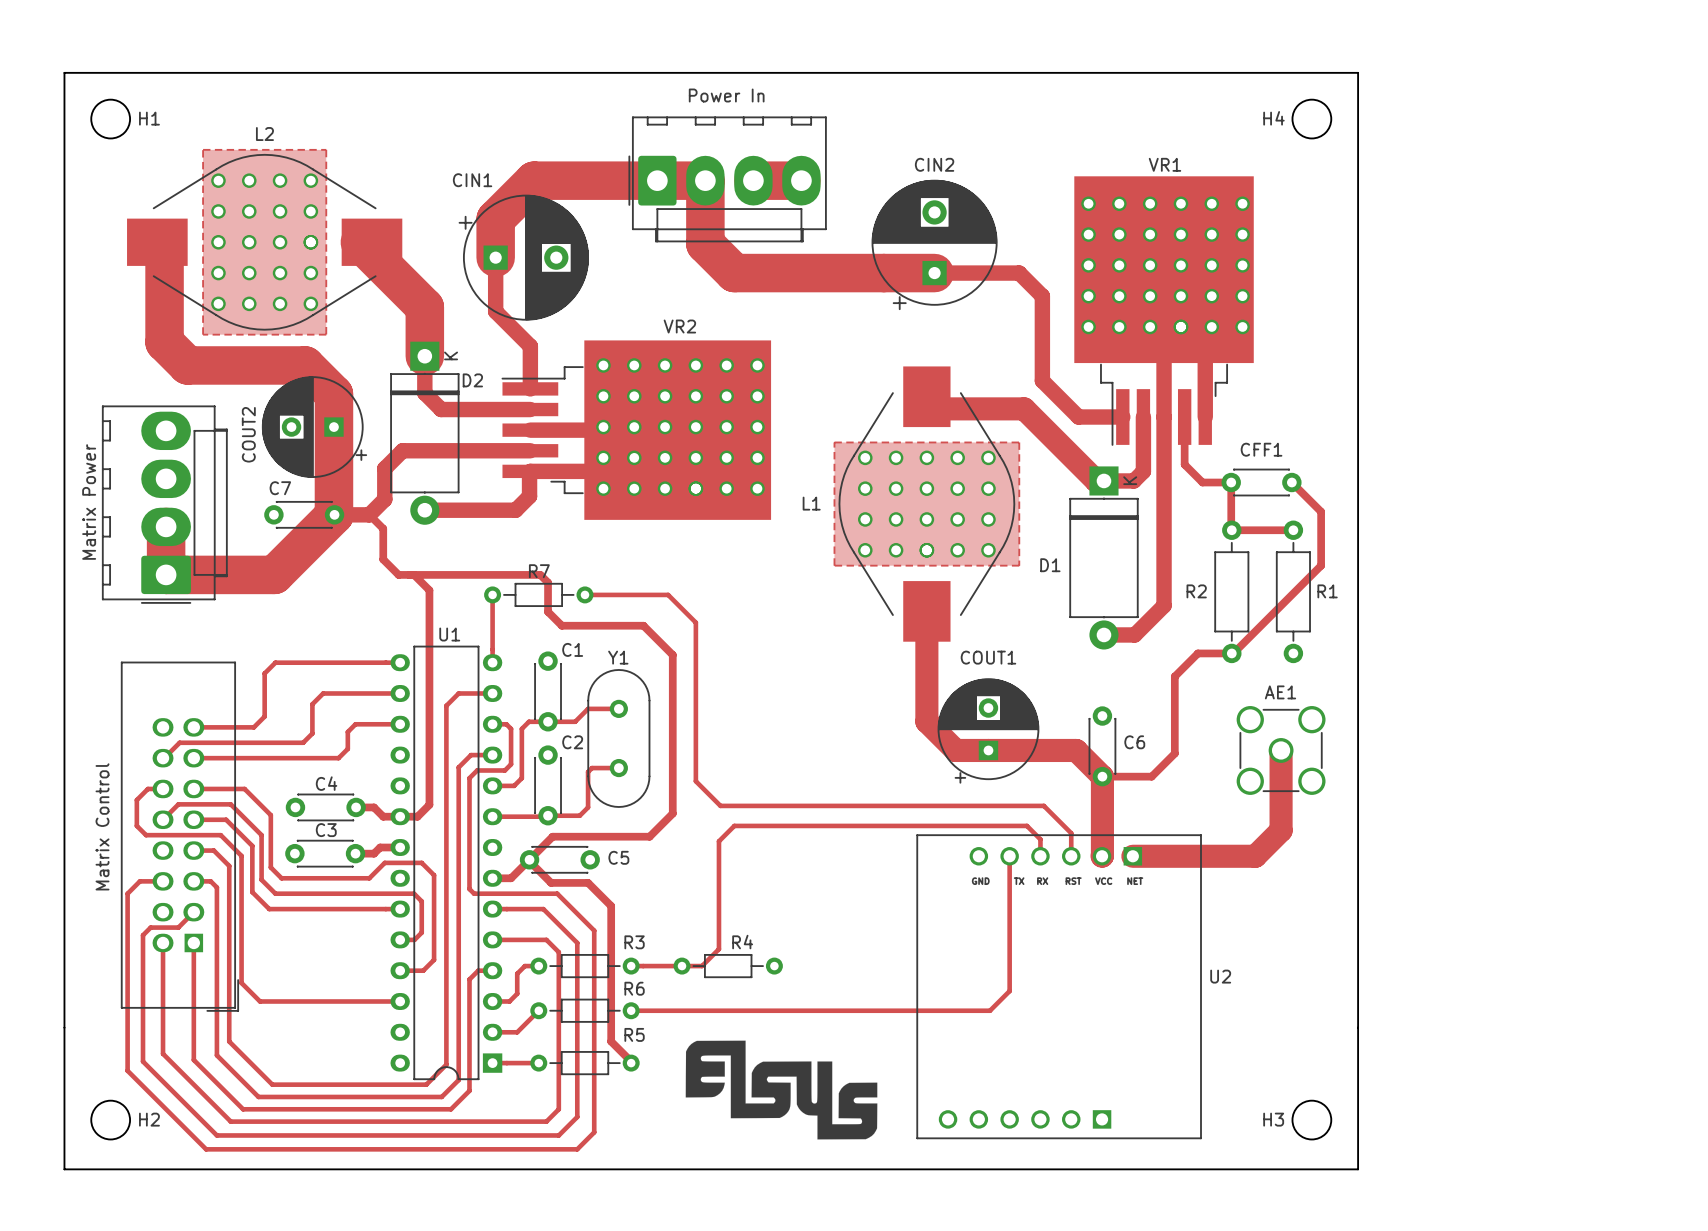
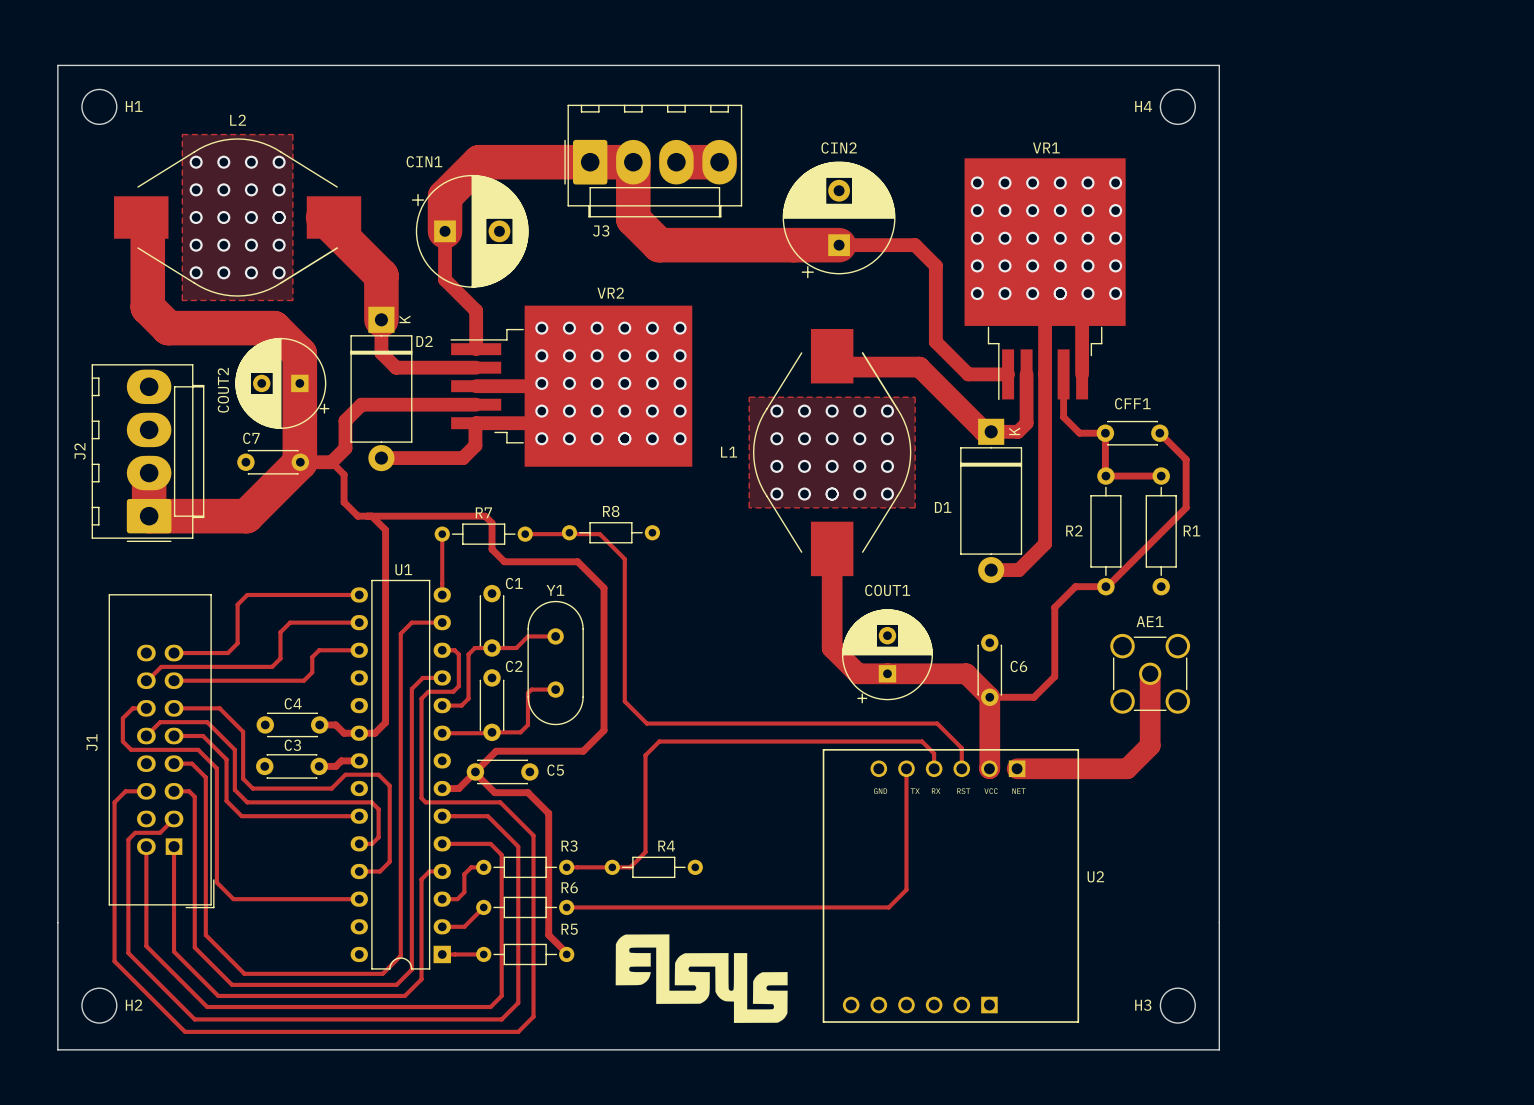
Power In name: Power In (726, 95) -> J3 (601, 230)
Matrix Power name: Matrix Power (89, 502) -> J2 (80, 451)
R8: none -> (610, 532)
Matrix Control name: Matrix Control (102, 826) -> J1 (92, 742)

